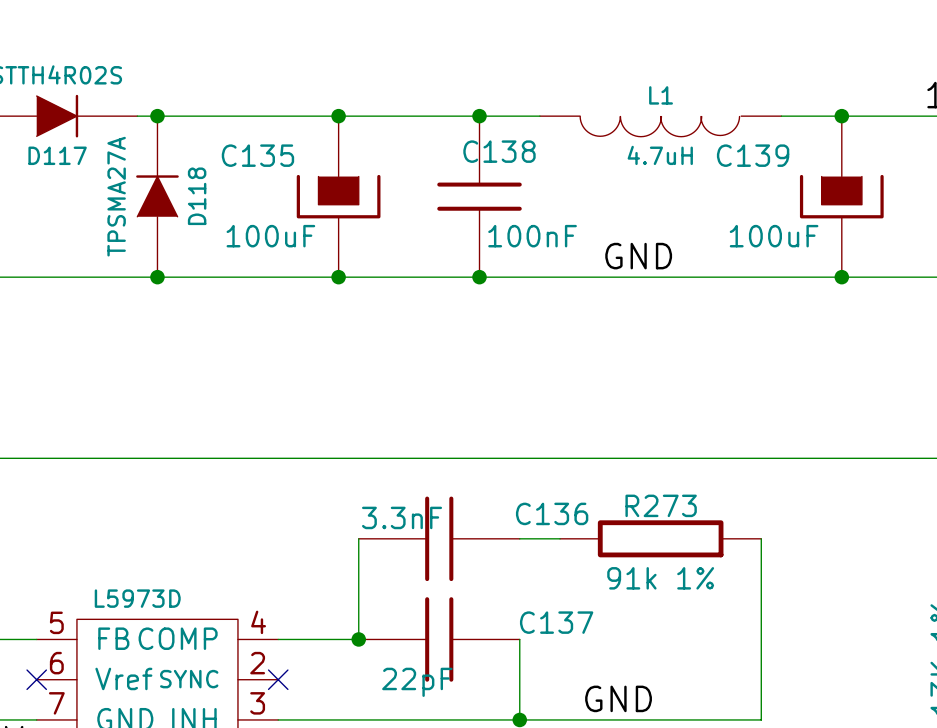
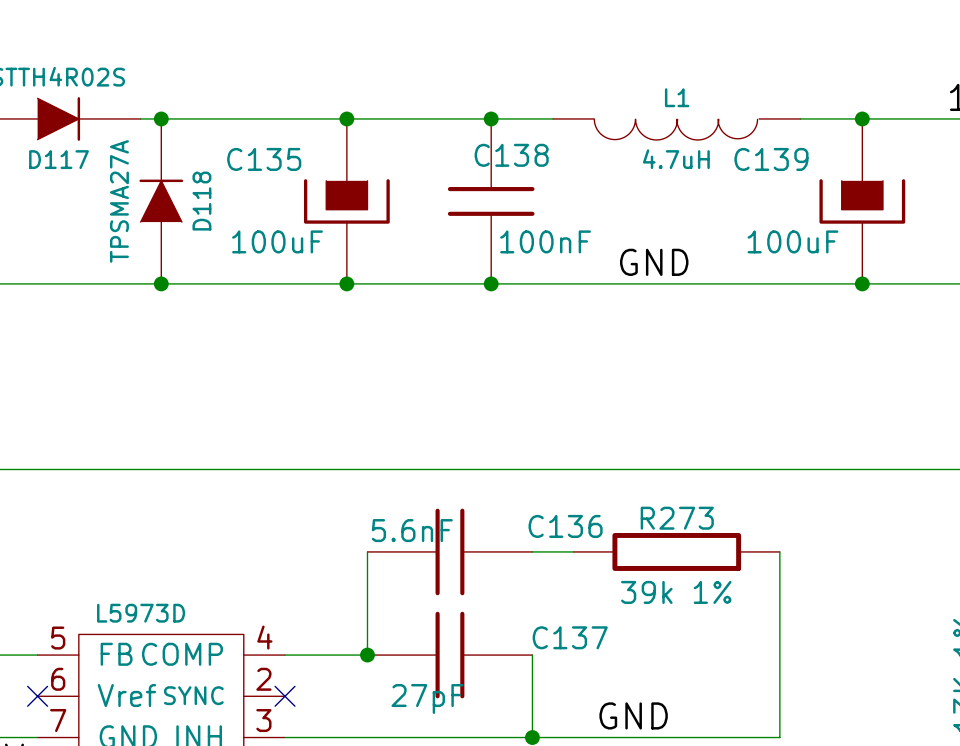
C136 value: 3.3nF (402, 517) -> 5.6nF (412, 530)
R273 value: 91k 1% (660, 578) -> 39k 1% (676, 592)
C137 value: 22pF (417, 682) -> 27pF (427, 698)

